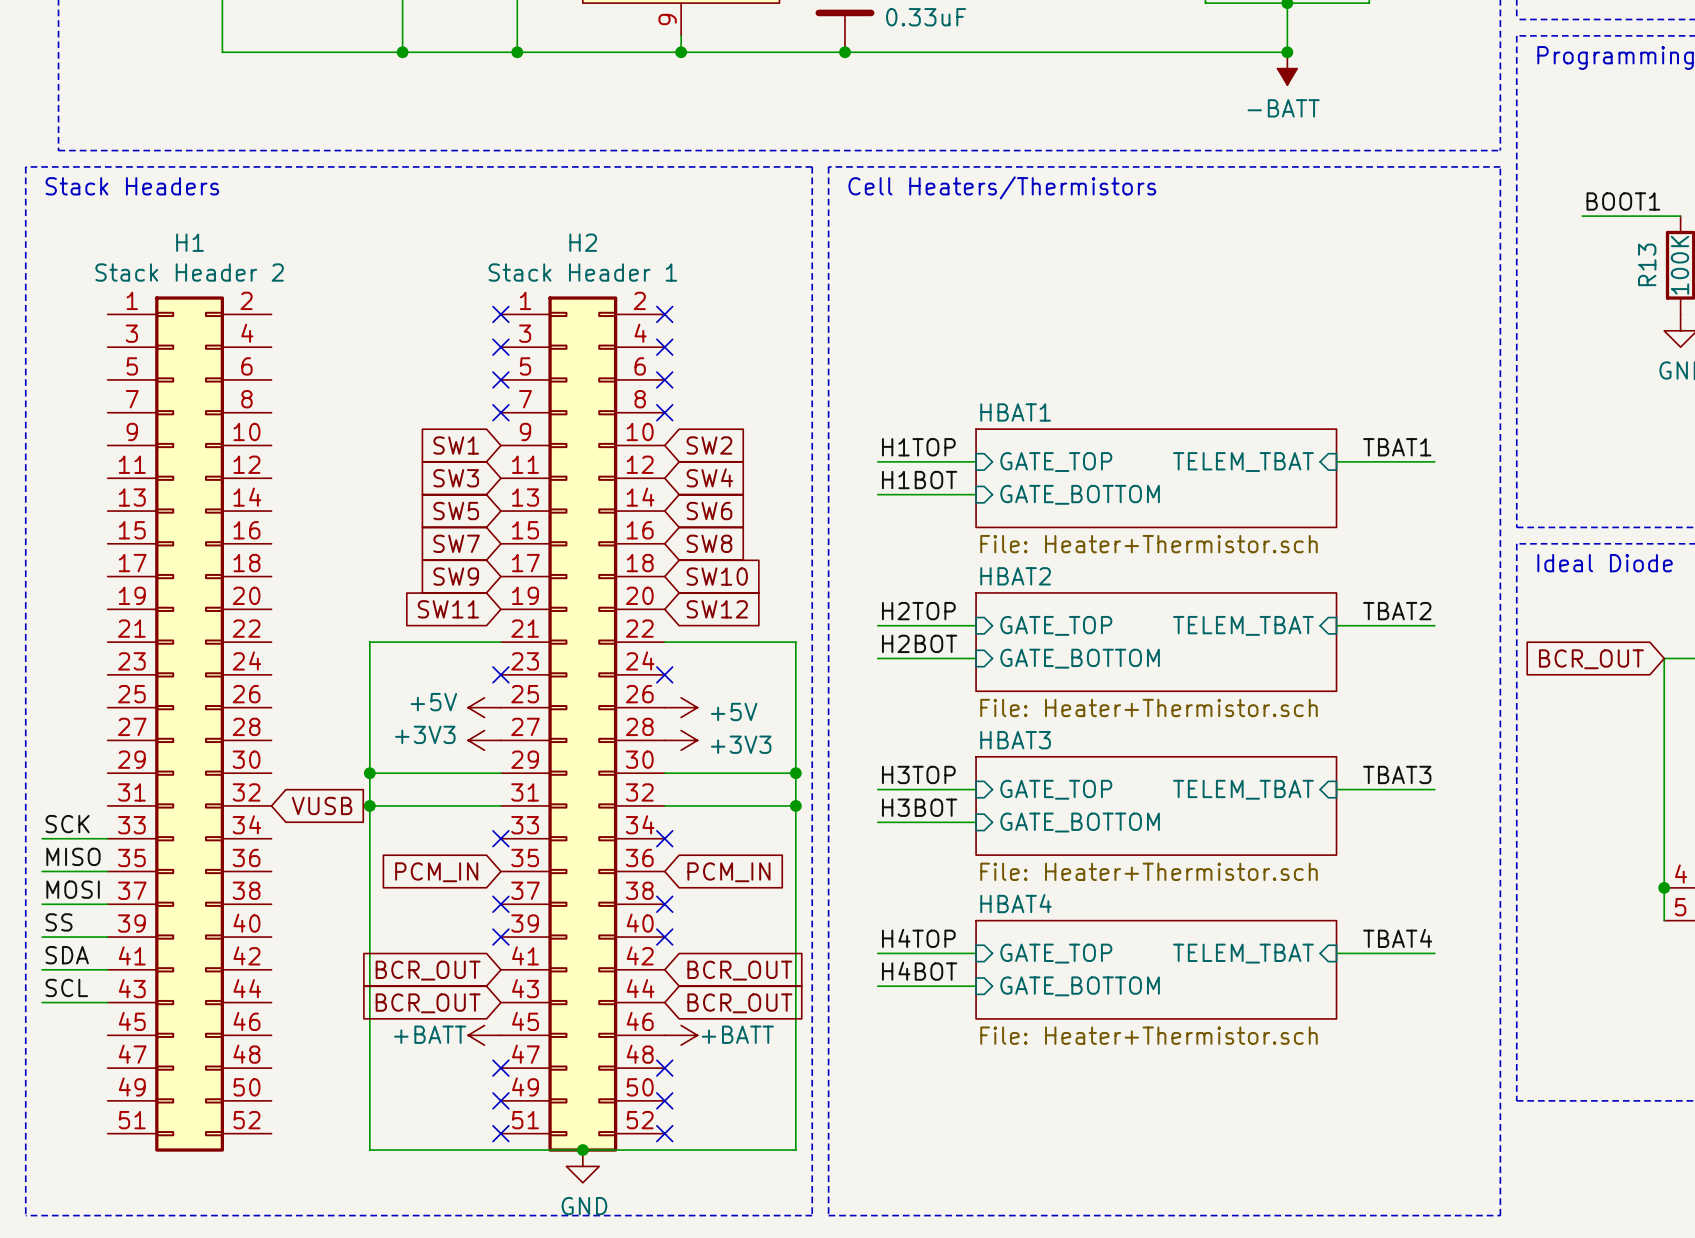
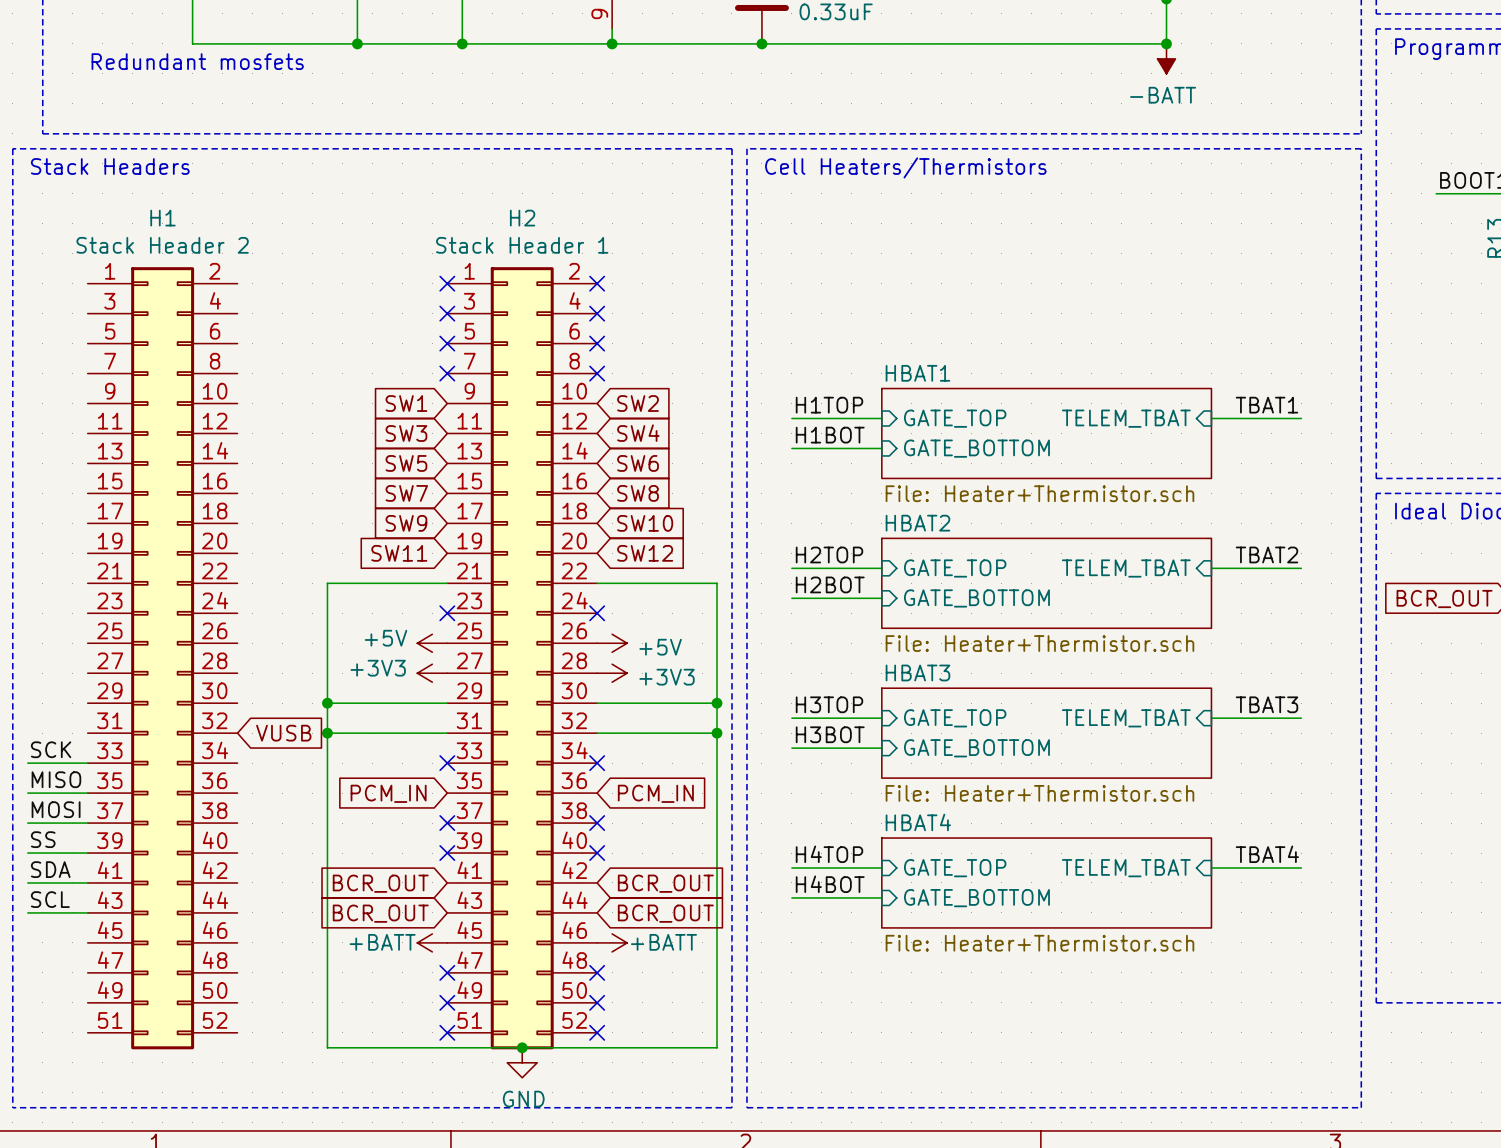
text: none -> Redundant mosfets (197, 61)

